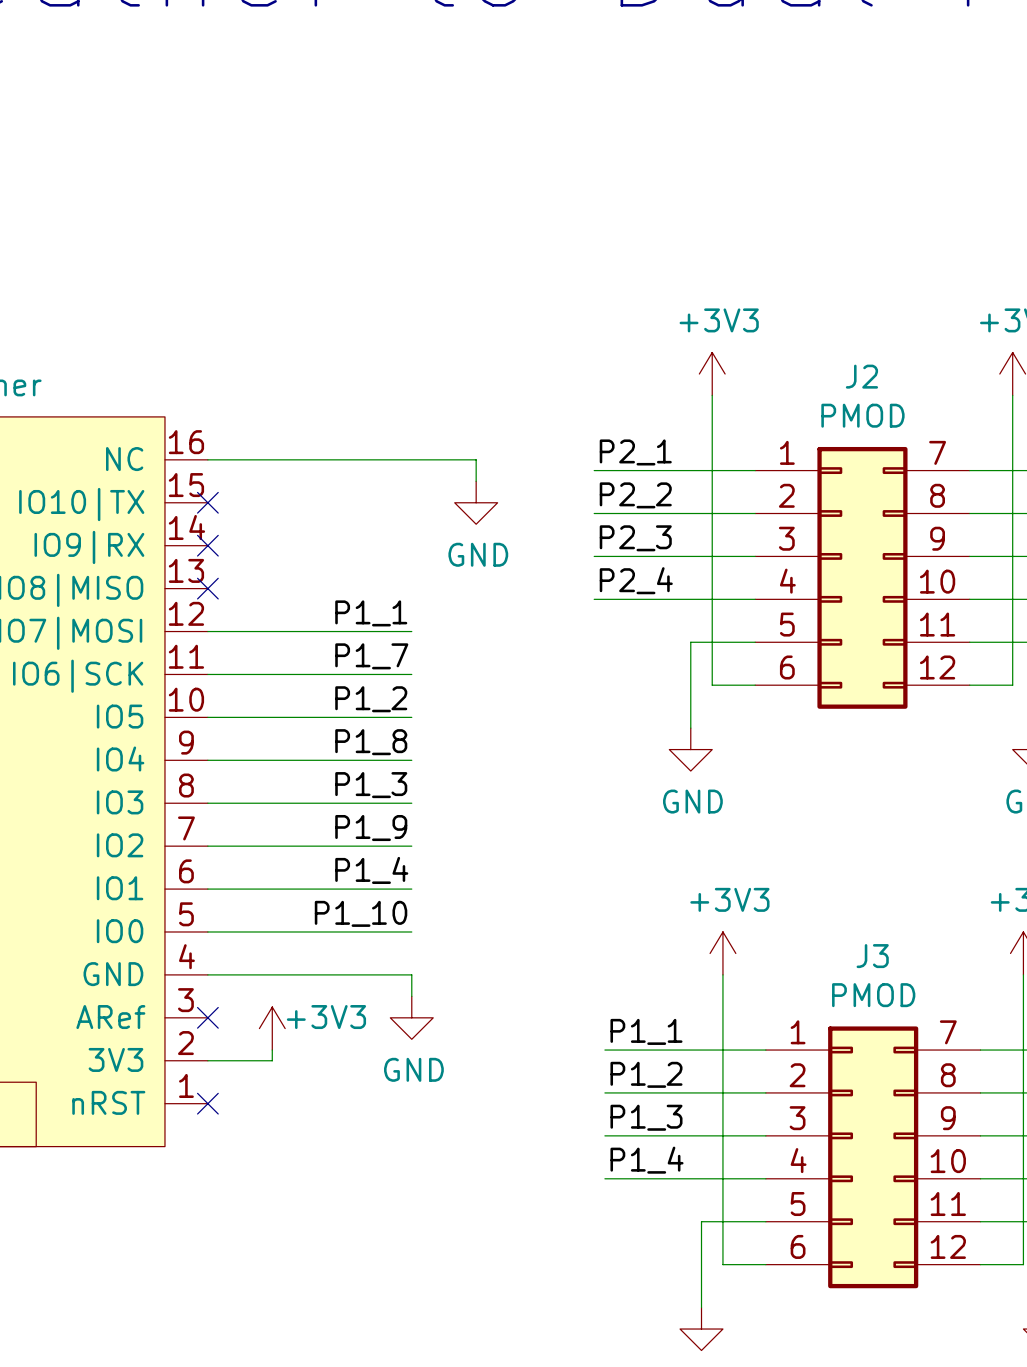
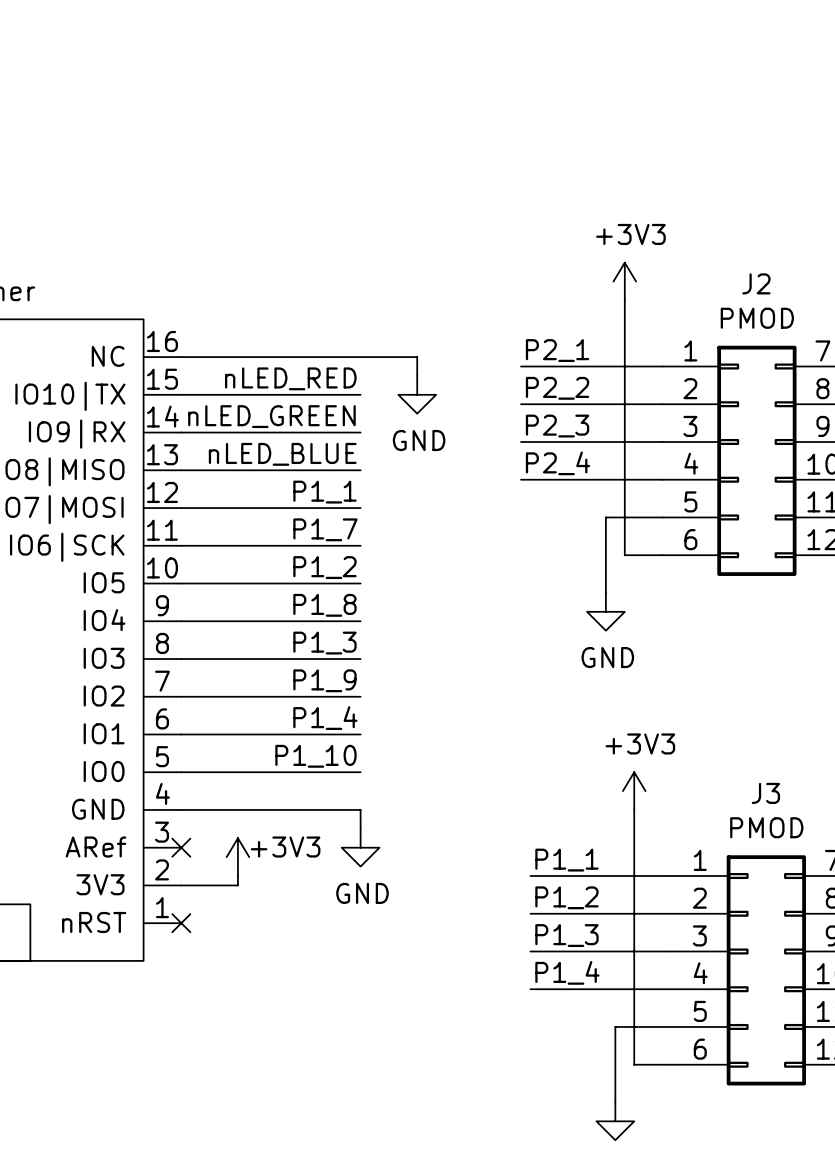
label: none -> nLED_RED (290, 378)
wire: none -> (181, 394) (360, 394)
no-connect mark: (207, 502) -> none
label: none -> nLED_GREEN (271, 416)
wire: none -> (181, 432) (360, 432)
no-connect mark: (207, 545) -> none
label: none -> nLED_BLUE (282, 454)
wire: none -> (181, 470) (360, 470)
no-connect mark: (207, 588) -> none

